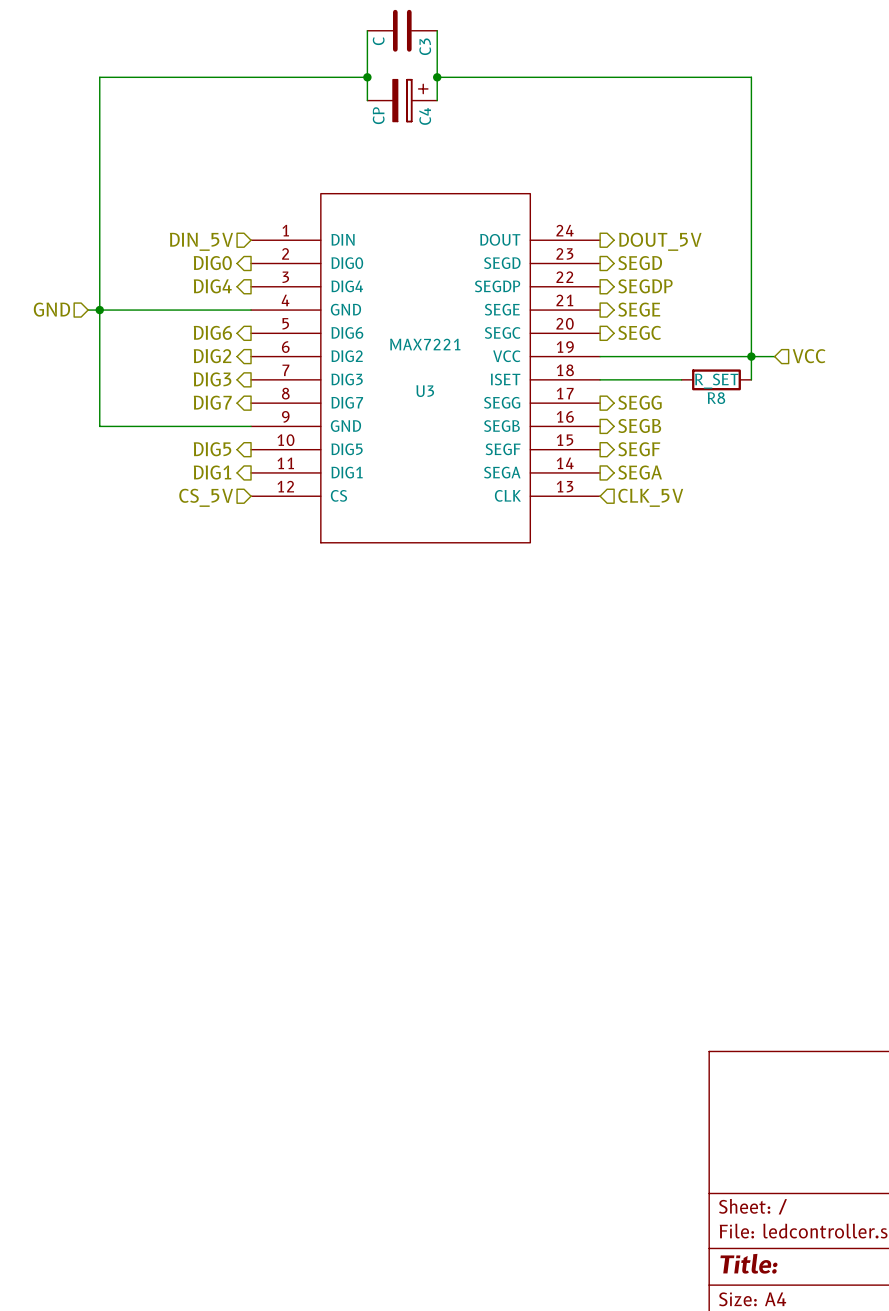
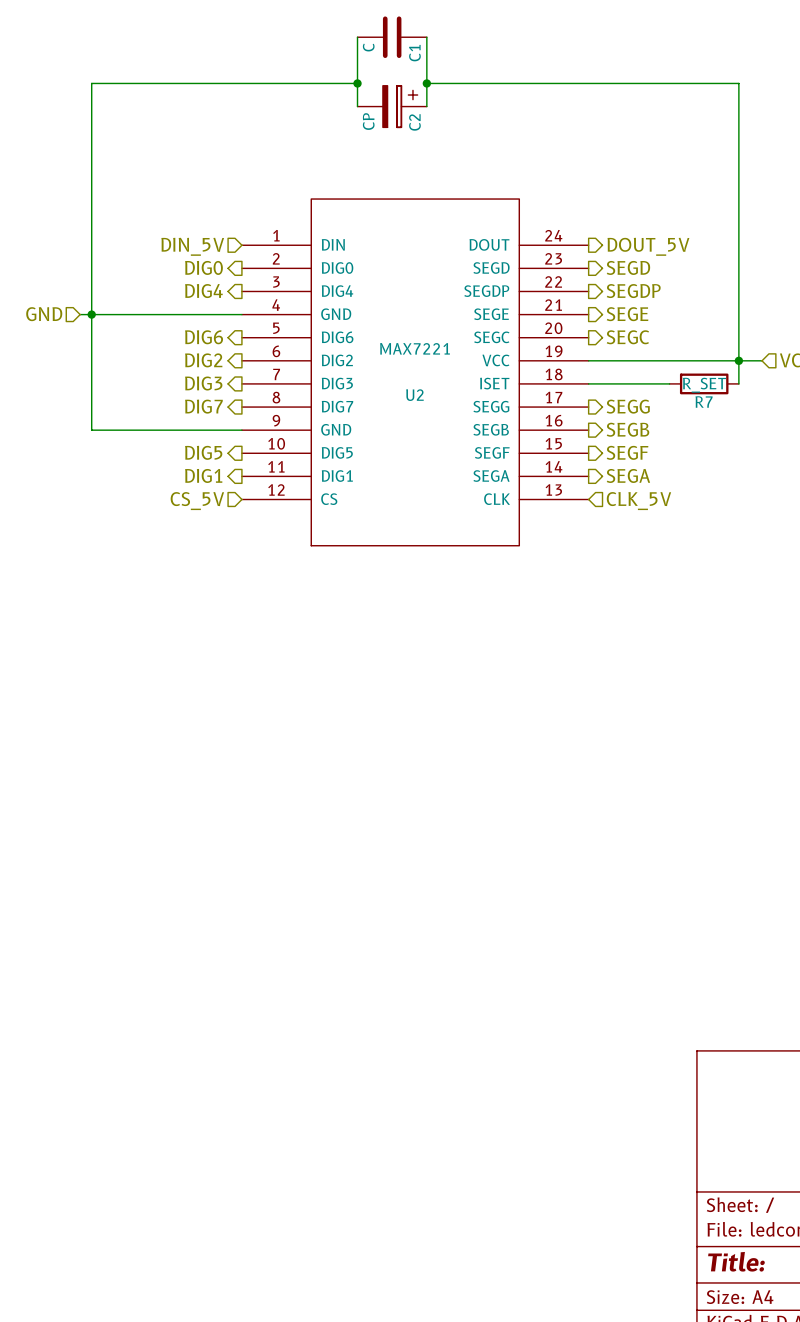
C3 name: C3 (425, 46) -> C1 (414, 53)
C4 name: C4 (425, 116) -> C2 (414, 122)
U3 name: U3 (425, 391) -> U2 (414, 395)
R8 name: R8 (716, 398) -> R7 (704, 402)

